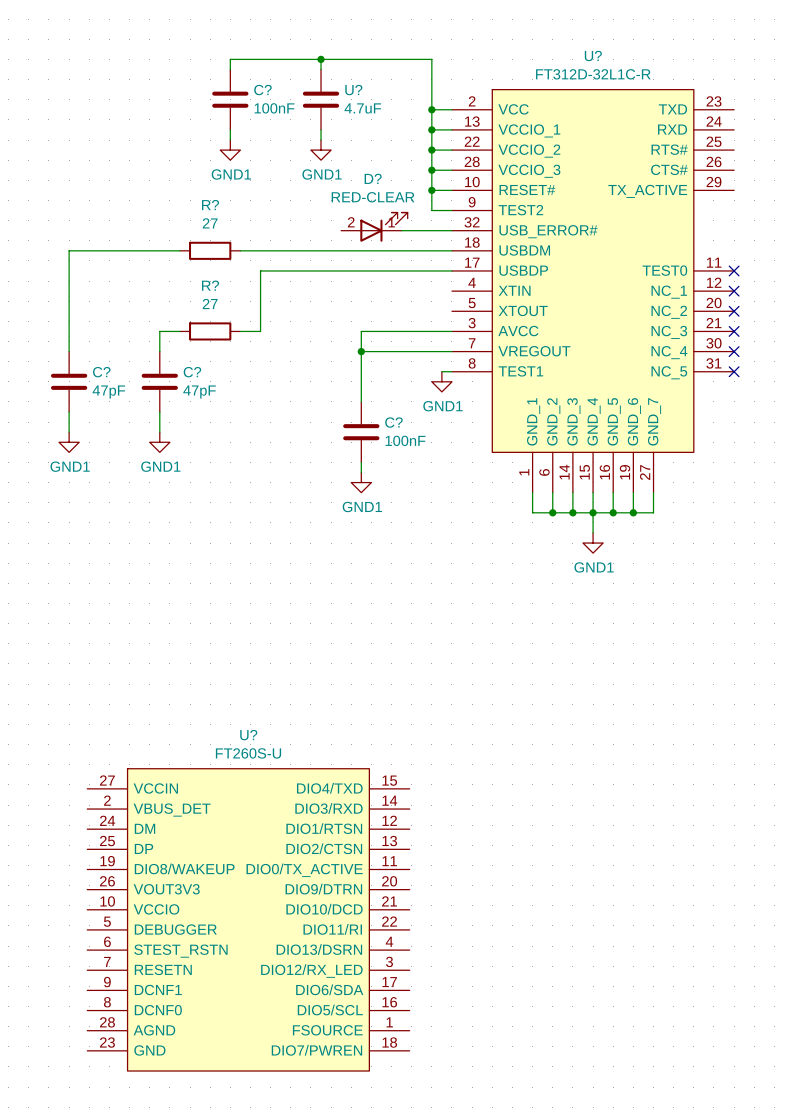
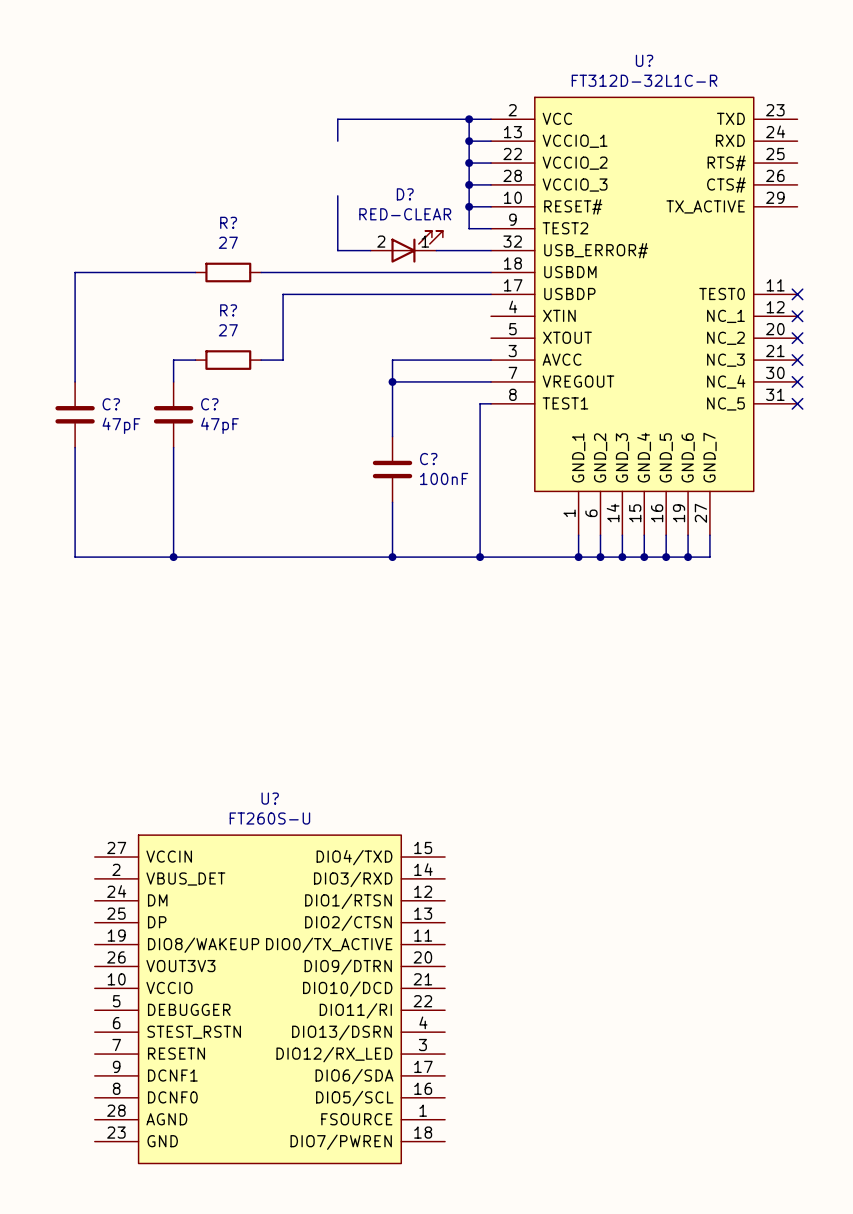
wire: (321, 59) (321, 69) -> none
junction: (321, 59) -> none
wire: (230, 69) (230, 59) (431, 59) (431, 109) -> (337, 141) (337, 119) (469, 119)
C?: 100nF (230, 99) -> none
U?: 4.7uF (321, 99) -> none
wire: (230, 129) (230, 140) -> none
wire: (321, 129) (321, 140) -> none
power symbol: GND1 (230, 150) -> none
power symbol: GND1 (321, 150) -> none
wire: none -> (337, 195) (337, 250) (370, 250)
wire: none -> (480, 403) (480, 557)
power symbol: GND1 (441, 381) -> none
wire: none -> (75, 469) (75, 557) (578, 557)
wire: none -> (173, 469) (173, 557)
power symbol: GND1 (69, 442) -> none
power symbol: GND1 (159, 442) -> none
wire: none -> (392, 513) (392, 557)
power symbol: GND1 (361, 482) -> none
junction: none -> (173, 557)
junction: none -> (392, 557)
junction: none -> (480, 557)
junction: none -> (578, 557)
wire: (593, 512) (593, 532) -> none
power symbol: GND1 (593, 543) -> none

